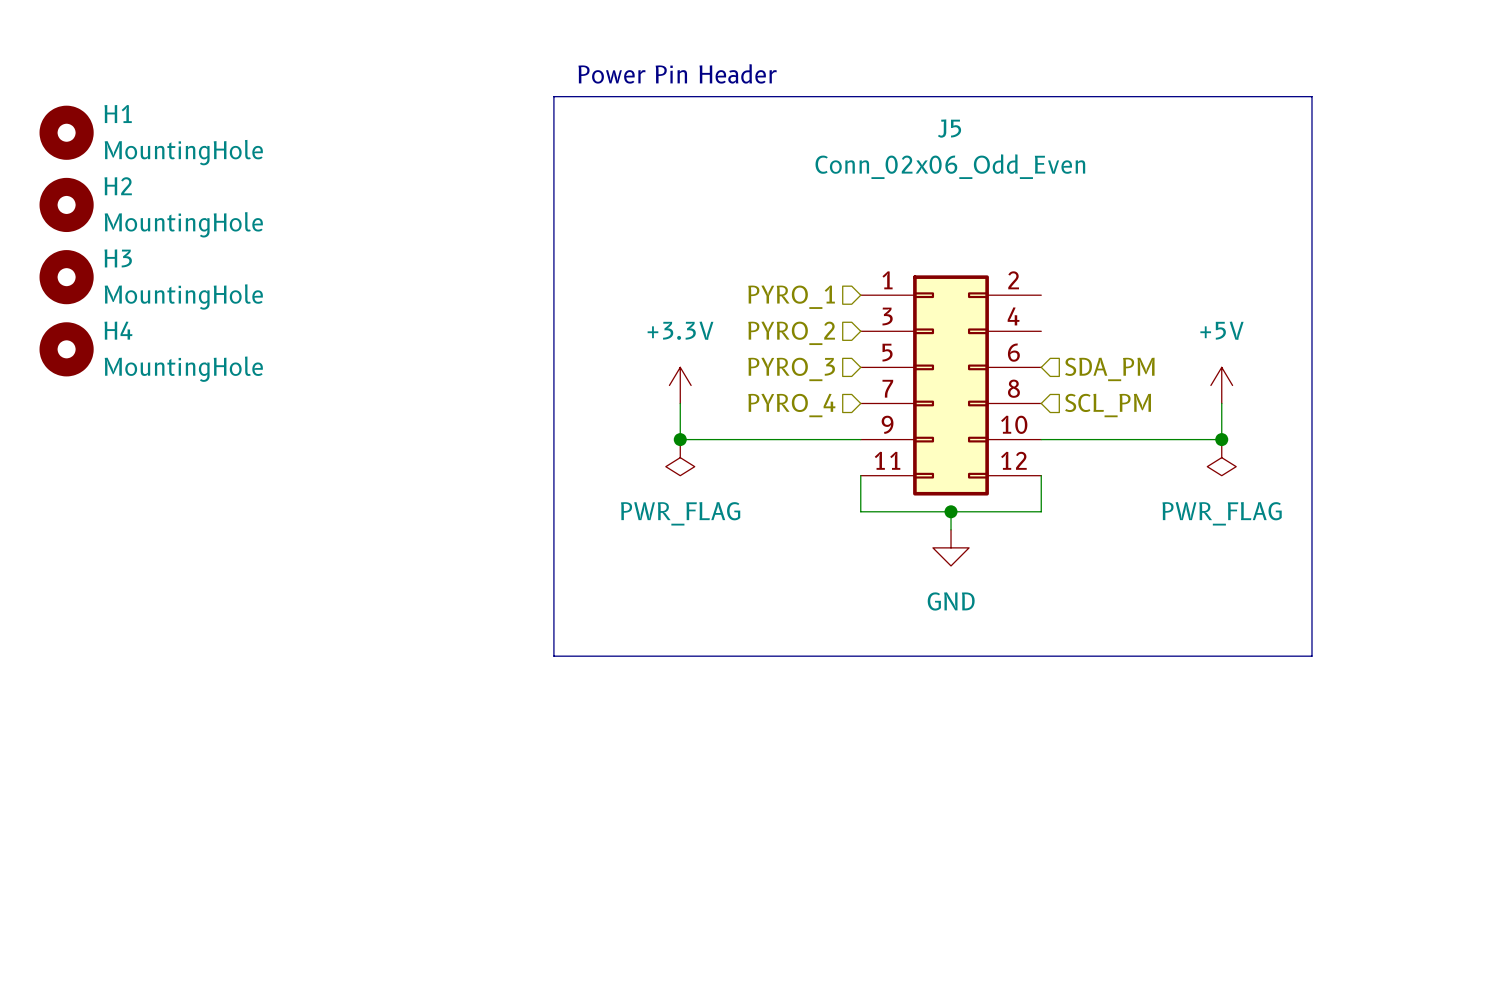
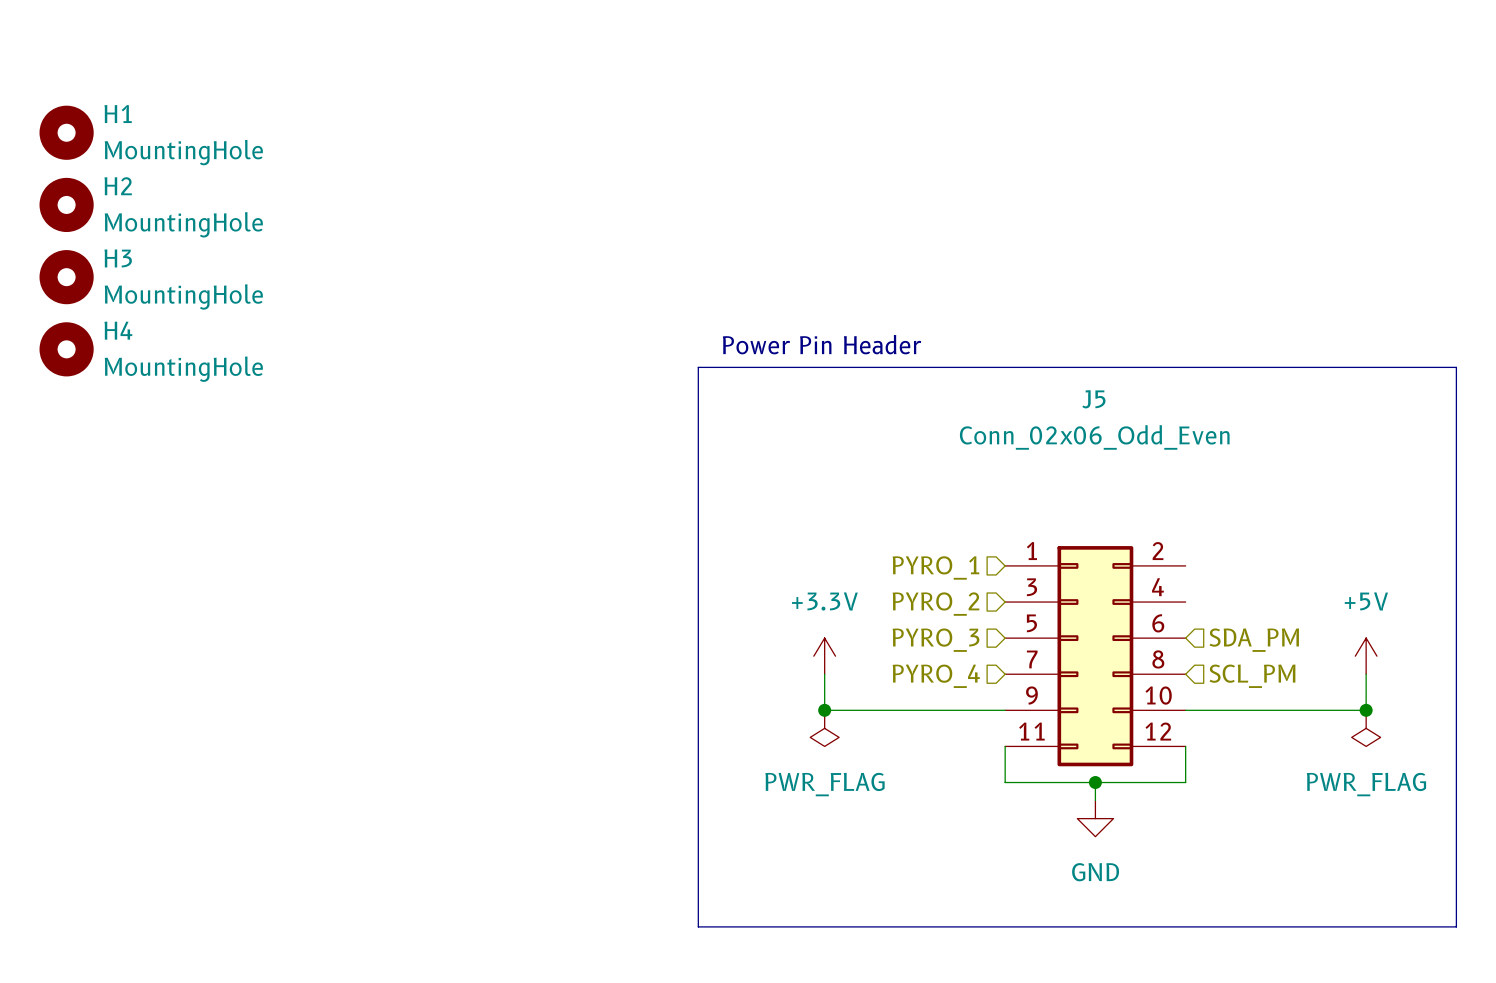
text position: Power Pin Header (677, 73) -> Power Pin Header (821, 344)
line: (553, 96) (1311, 96) (1311, 656) (553, 656) (553, 96) -> (698, 367) (1456, 367) (1456, 926) (698, 926) (698, 367)
hierarchical label position: PYRO_1 (791, 297) -> PYRO_1 (935, 567)
hierarchical label position: PYRO_2 (791, 333) -> PYRO_2 (935, 604)
hierarchical label position: PYRO_3 (791, 369) -> PYRO_3 (936, 640)
hierarchical label position: SDA_PM (1109, 369) -> SDA_PM (1254, 640)
power symbol position: +3.3V (680, 385) -> +3.3V (824, 656)
J5 position: (951, 385) -> (1095, 656)
power symbol position: +5V (1221, 385) -> +5V (1366, 656)
wire: (680, 403) (680, 439) (860, 439) -> (824, 674) (824, 710) (1005, 710)
wire: (1221, 403) (1221, 439) (1041, 439) -> (1366, 674) (1366, 710) (1185, 710)
hierarchical label position: PYRO_4 (791, 405) -> PYRO_4 (936, 676)
hierarchical label position: SCL_PM (1108, 405) -> SCL_PM (1252, 676)
junction: (680, 439) -> none
junction: (1221, 439) -> none
power symbol: PWR_FLAG (680, 457) -> none
power symbol: PWR_FLAG (1221, 457) -> none
wire: (860, 475) (860, 511) (1041, 511) (1041, 475) -> (1005, 746) (1005, 782) (1185, 782) (1185, 746)
wire: (951, 511) (951, 529) -> (1095, 782) (1095, 800)
junction: (951, 511) -> none
power symbol position: GND (951, 547) -> GND (1095, 818)
junction: none -> (824, 710)
junction: none -> (1366, 710)
power symbol: none -> PWR_FLAG (824, 728)
power symbol: none -> PWR_FLAG (1366, 728)
junction: none -> (1095, 782)

